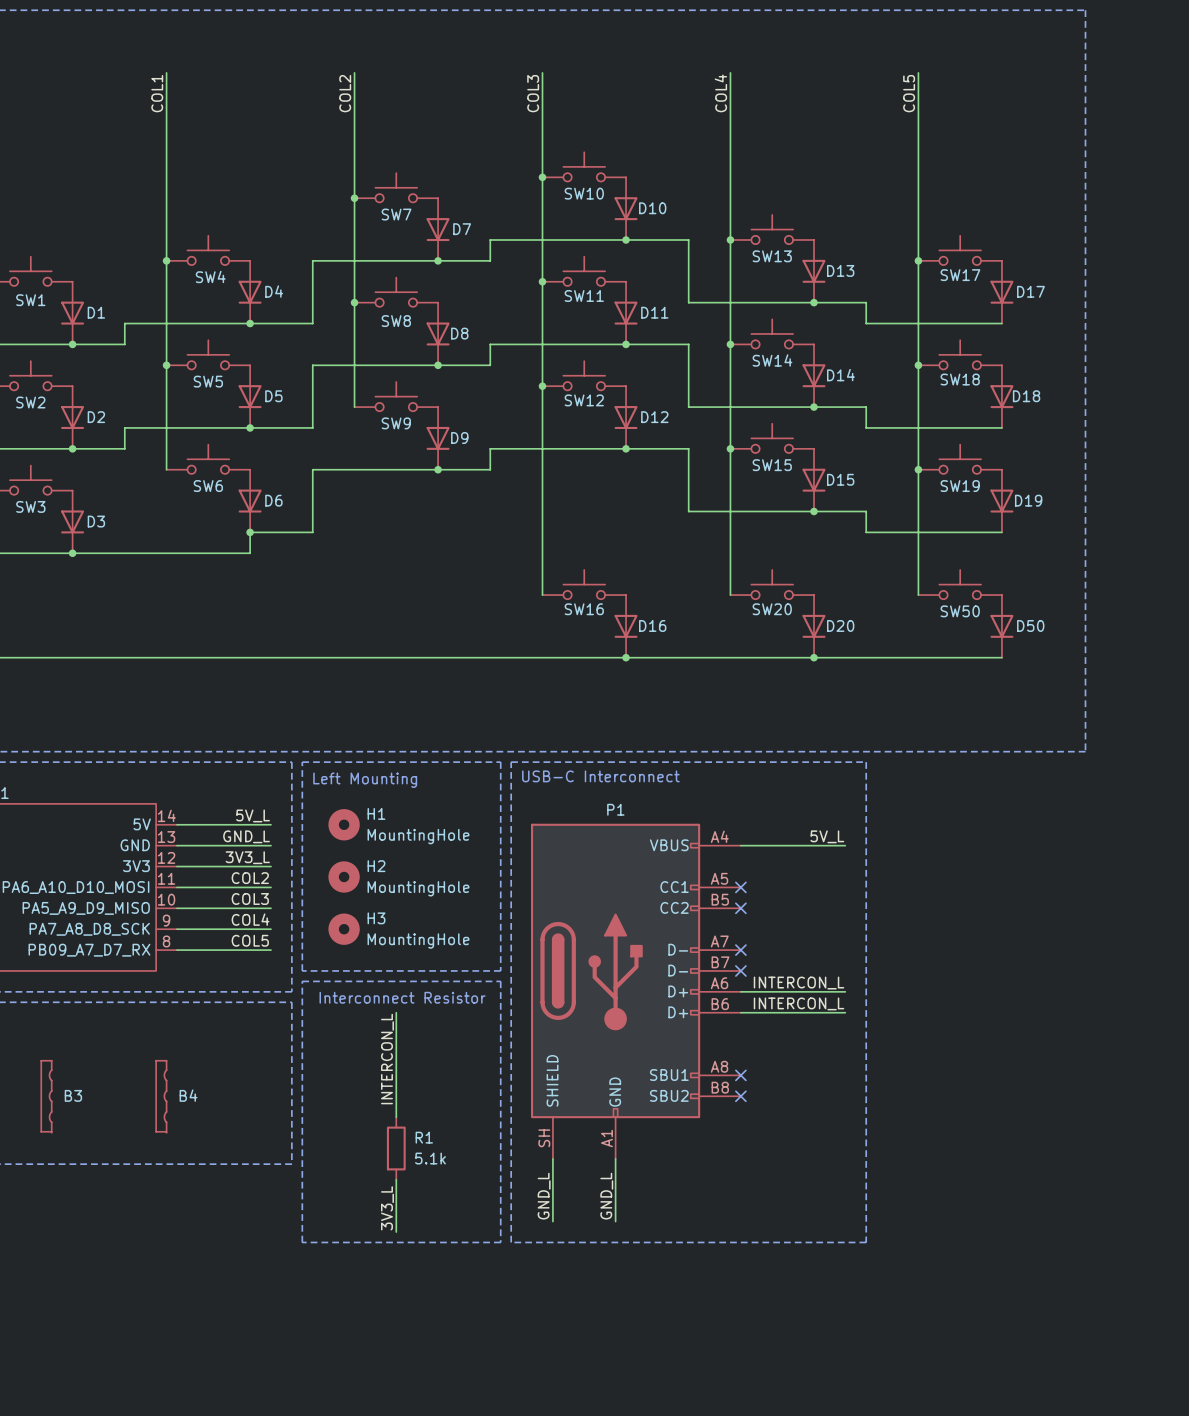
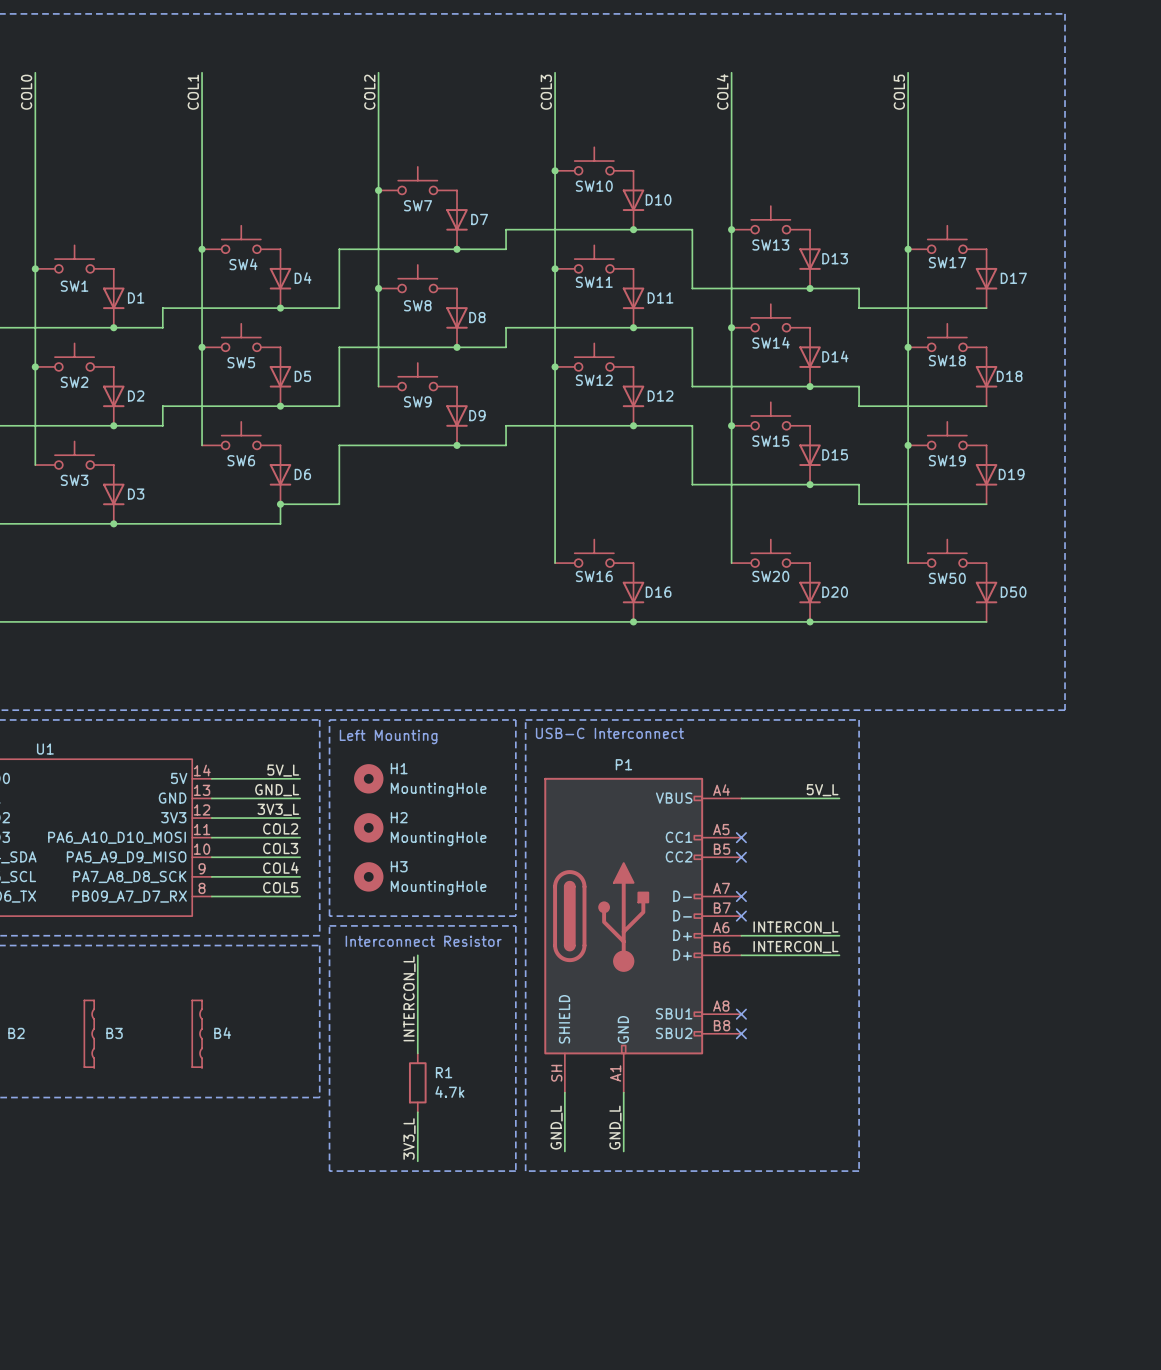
R1 value: 5.1k (430, 1158) -> 4.7k (449, 1092)

